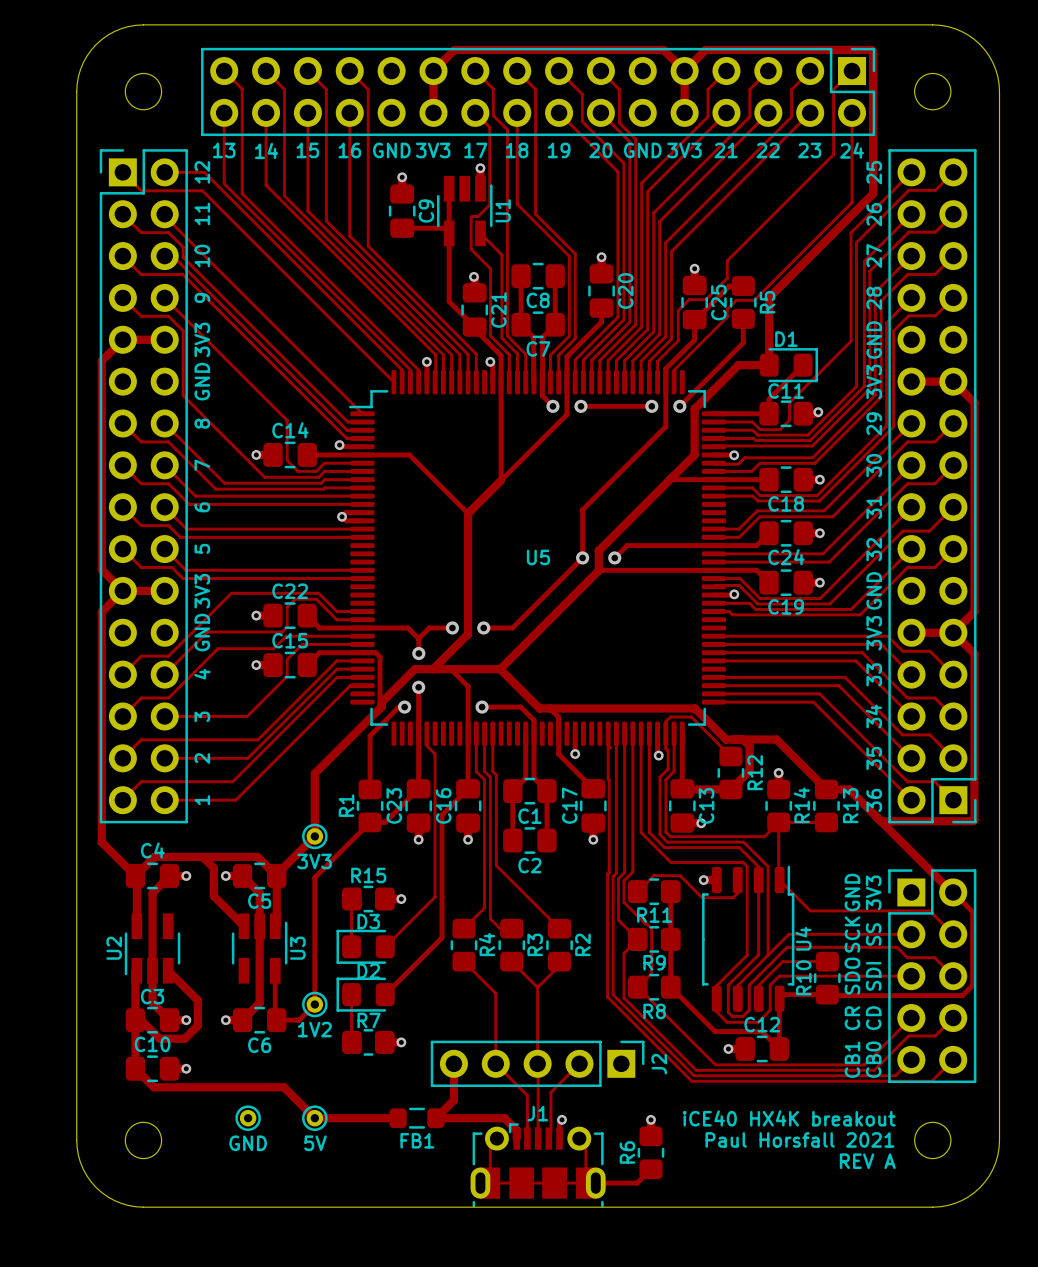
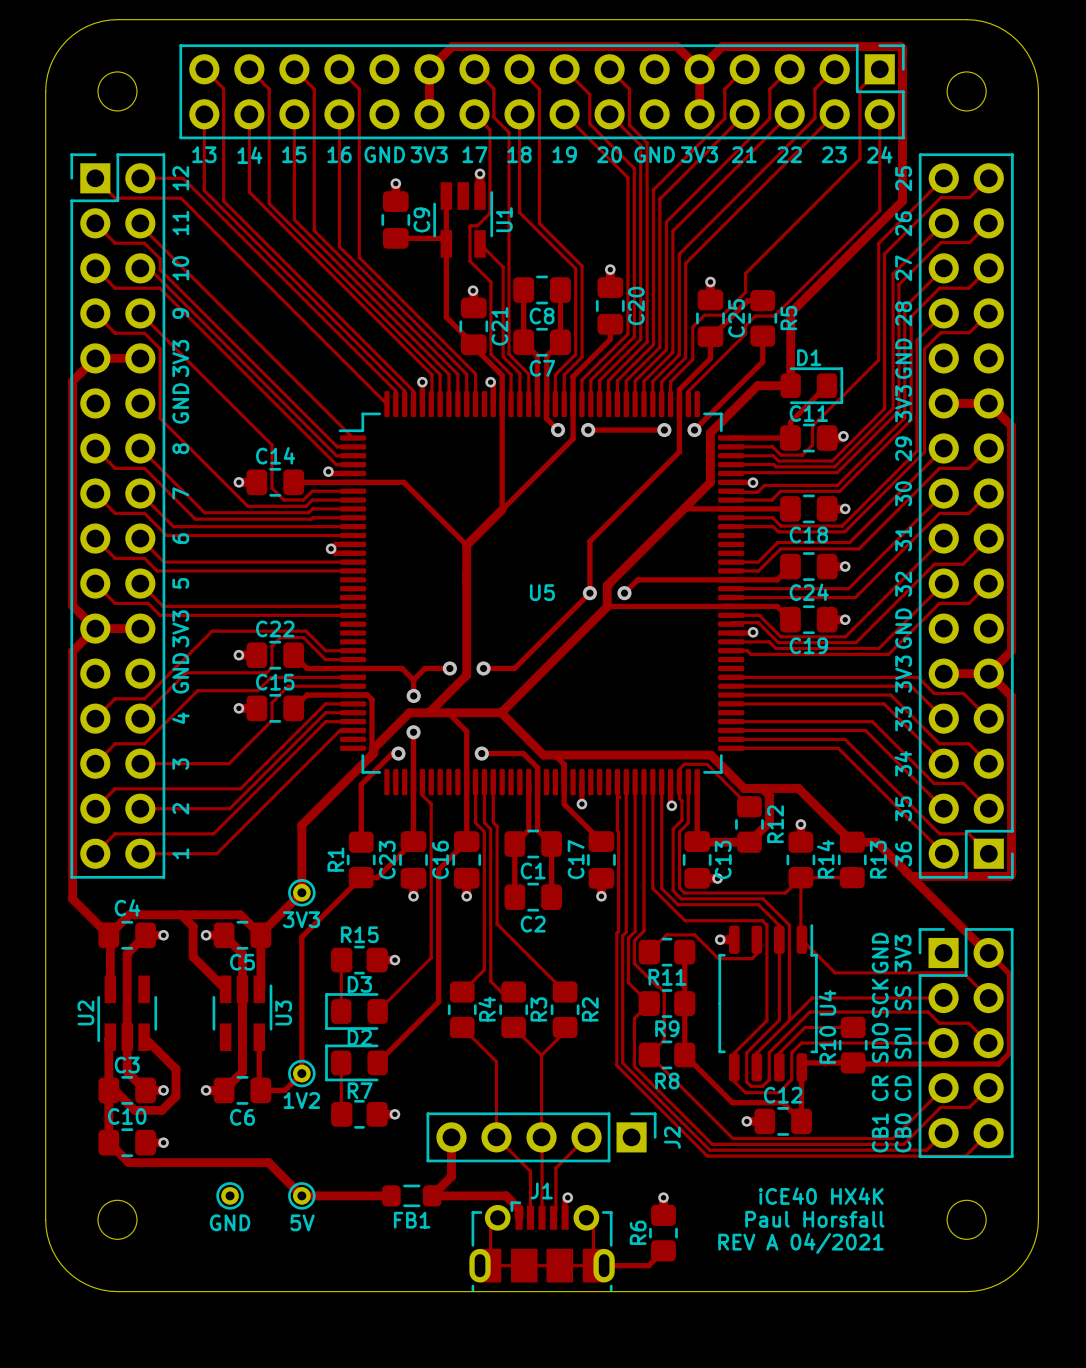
text: iCE40 HX4K breakout (789, 1118) -> iCE40 HX4K (821, 1196)
text: Paul Horsfall 2021 (799, 1139) -> Paul Horsfall (814, 1219)
text: REV A (867, 1161) -> none
text: none -> REV A 04/2021 (801, 1243)

